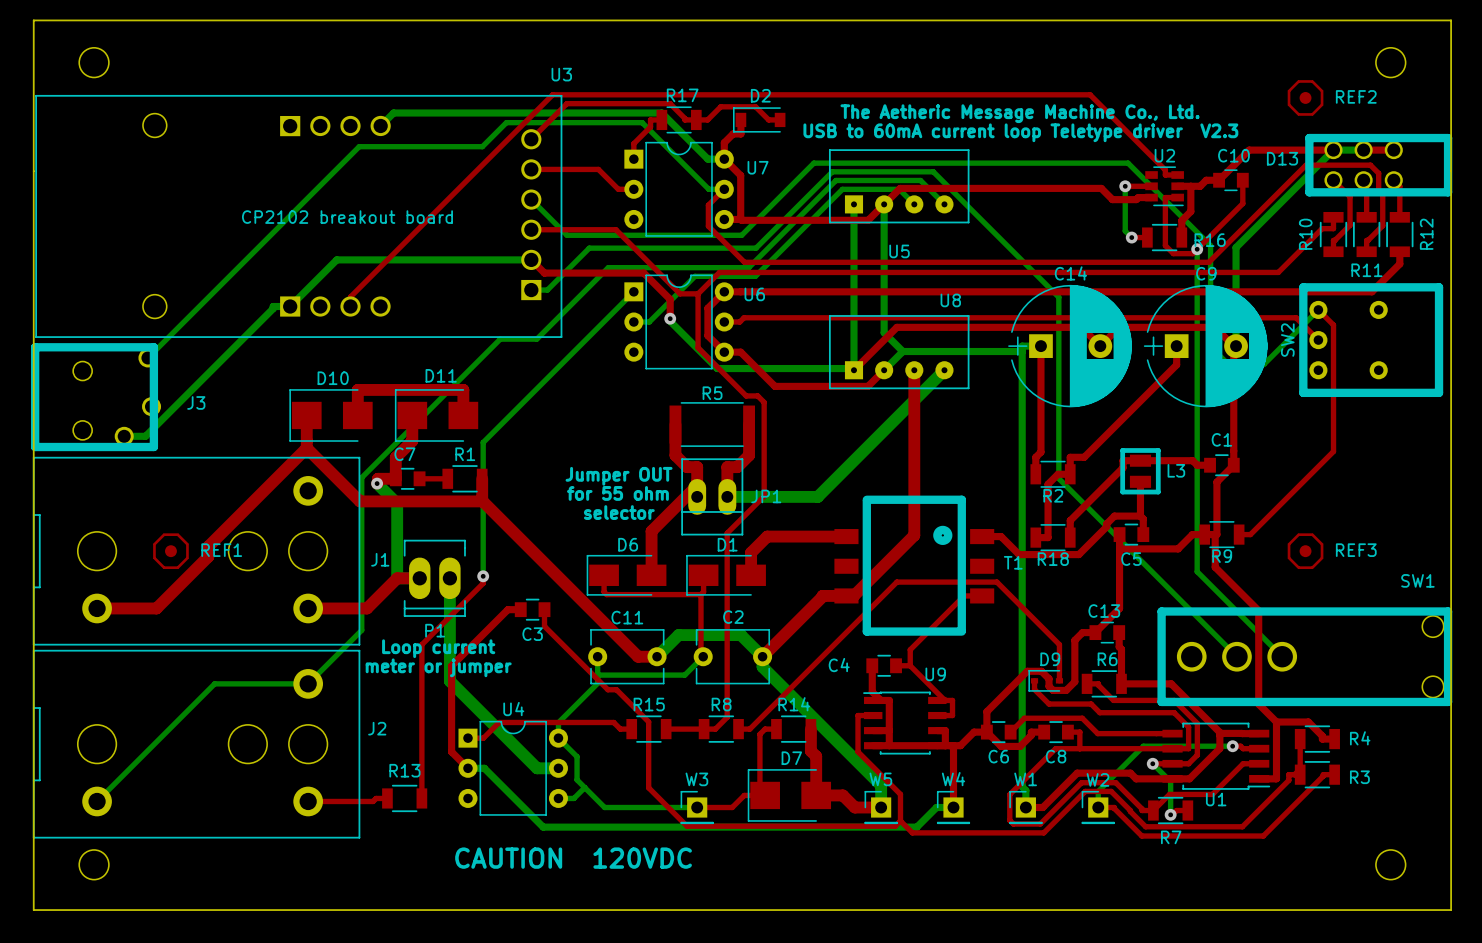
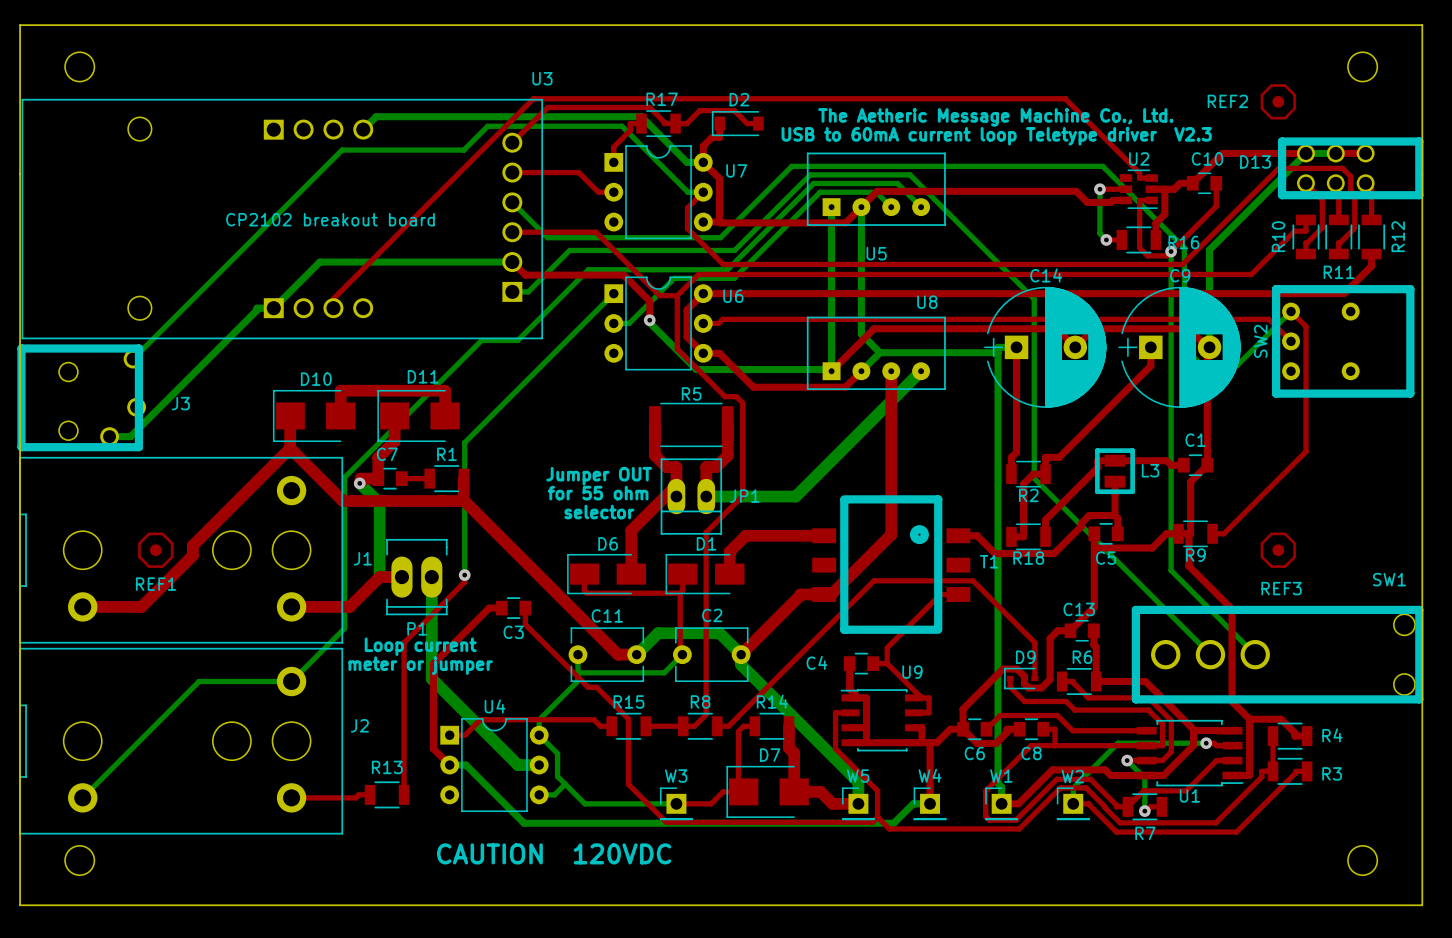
REF2 name position: REF2 (1356, 96) -> REF2 (1227, 101)
REF1 name position: REF1 (221, 550) -> REF1 (156, 584)
REF3 name position: REF3 (1356, 550) -> REF3 (1281, 588)

